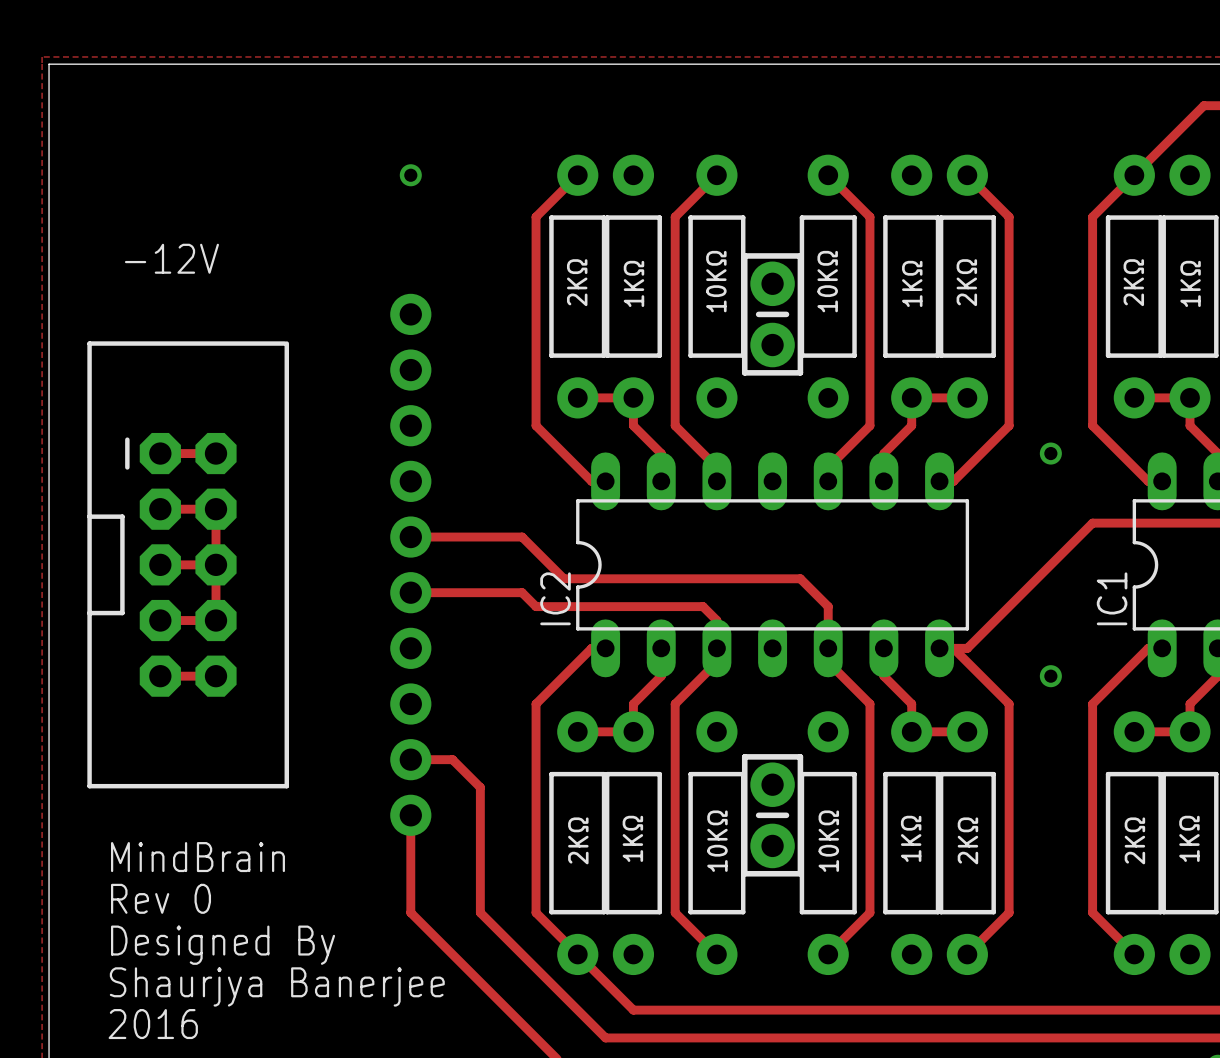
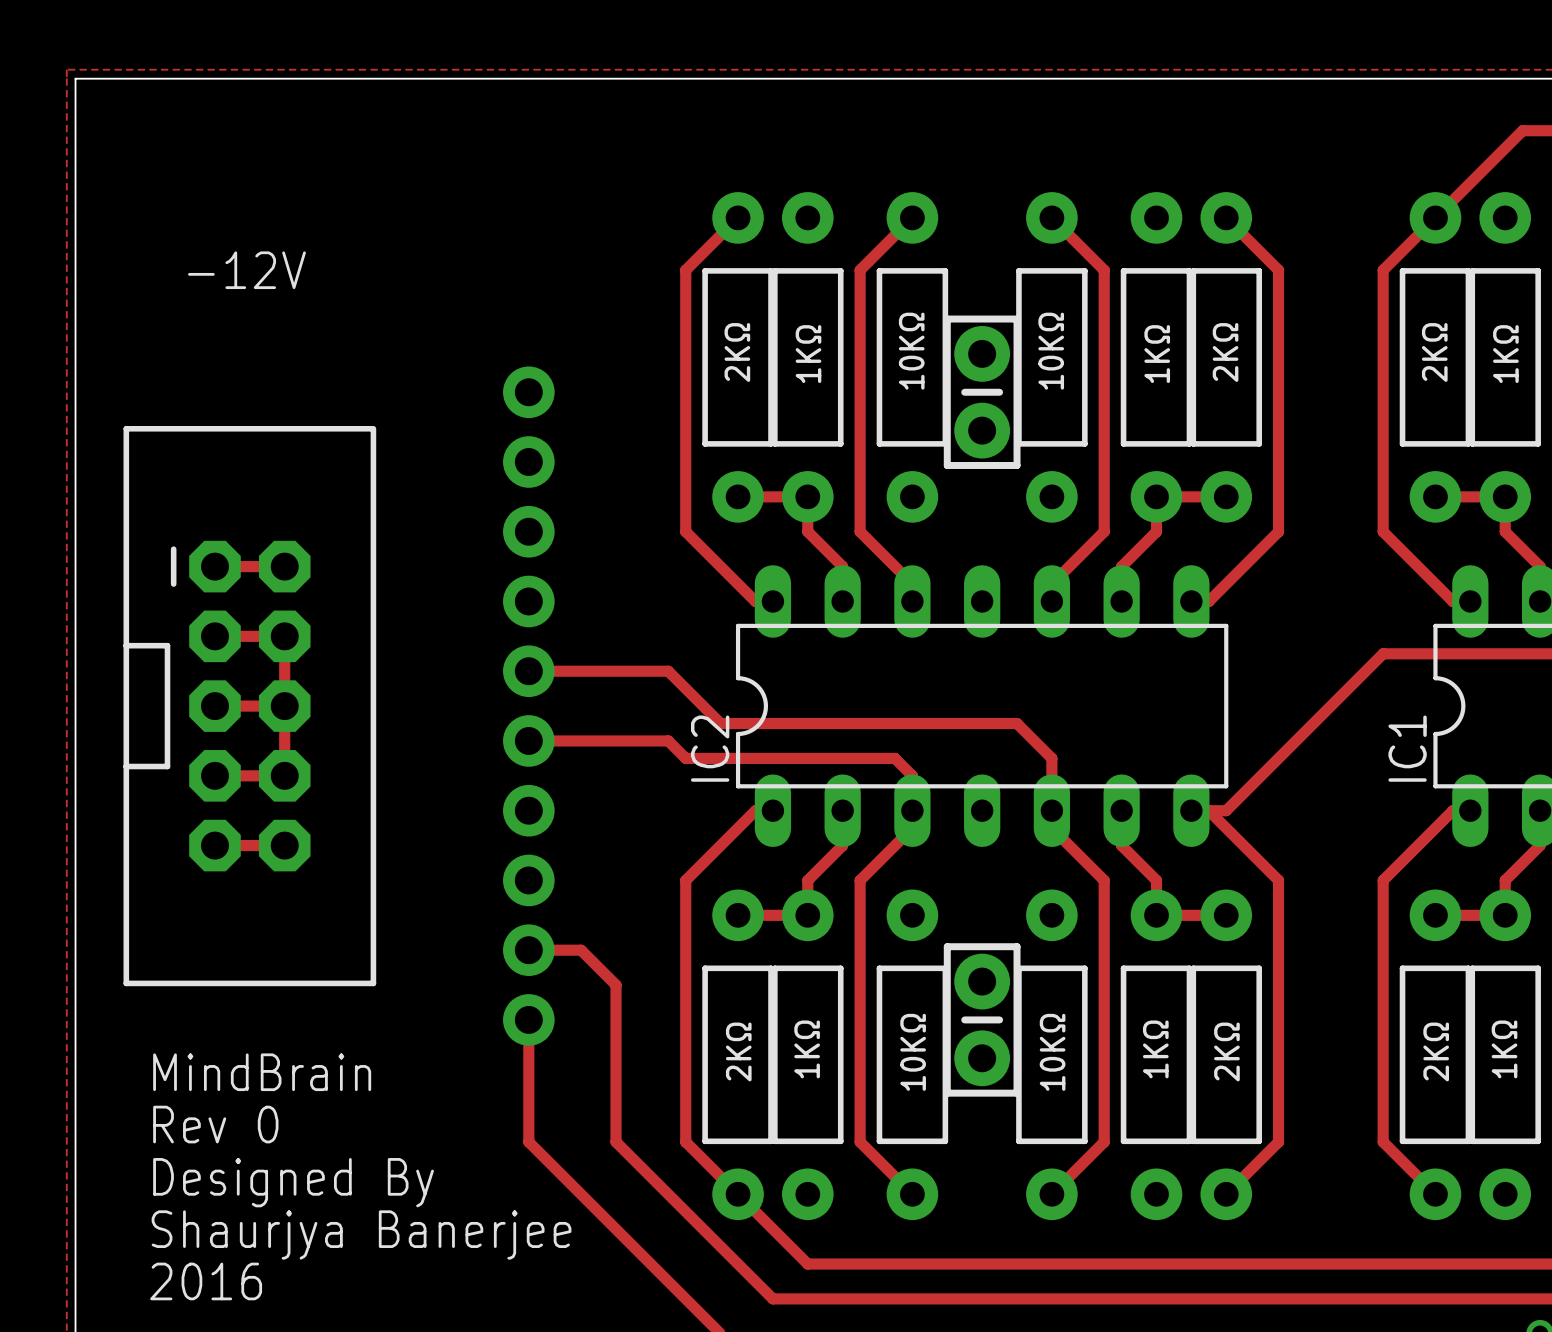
via: (410, 175) -> none
text position: -12V (171, 258) -> -12V (246, 270)
via: (1050, 453) -> none
via: (1050, 676) -> none

